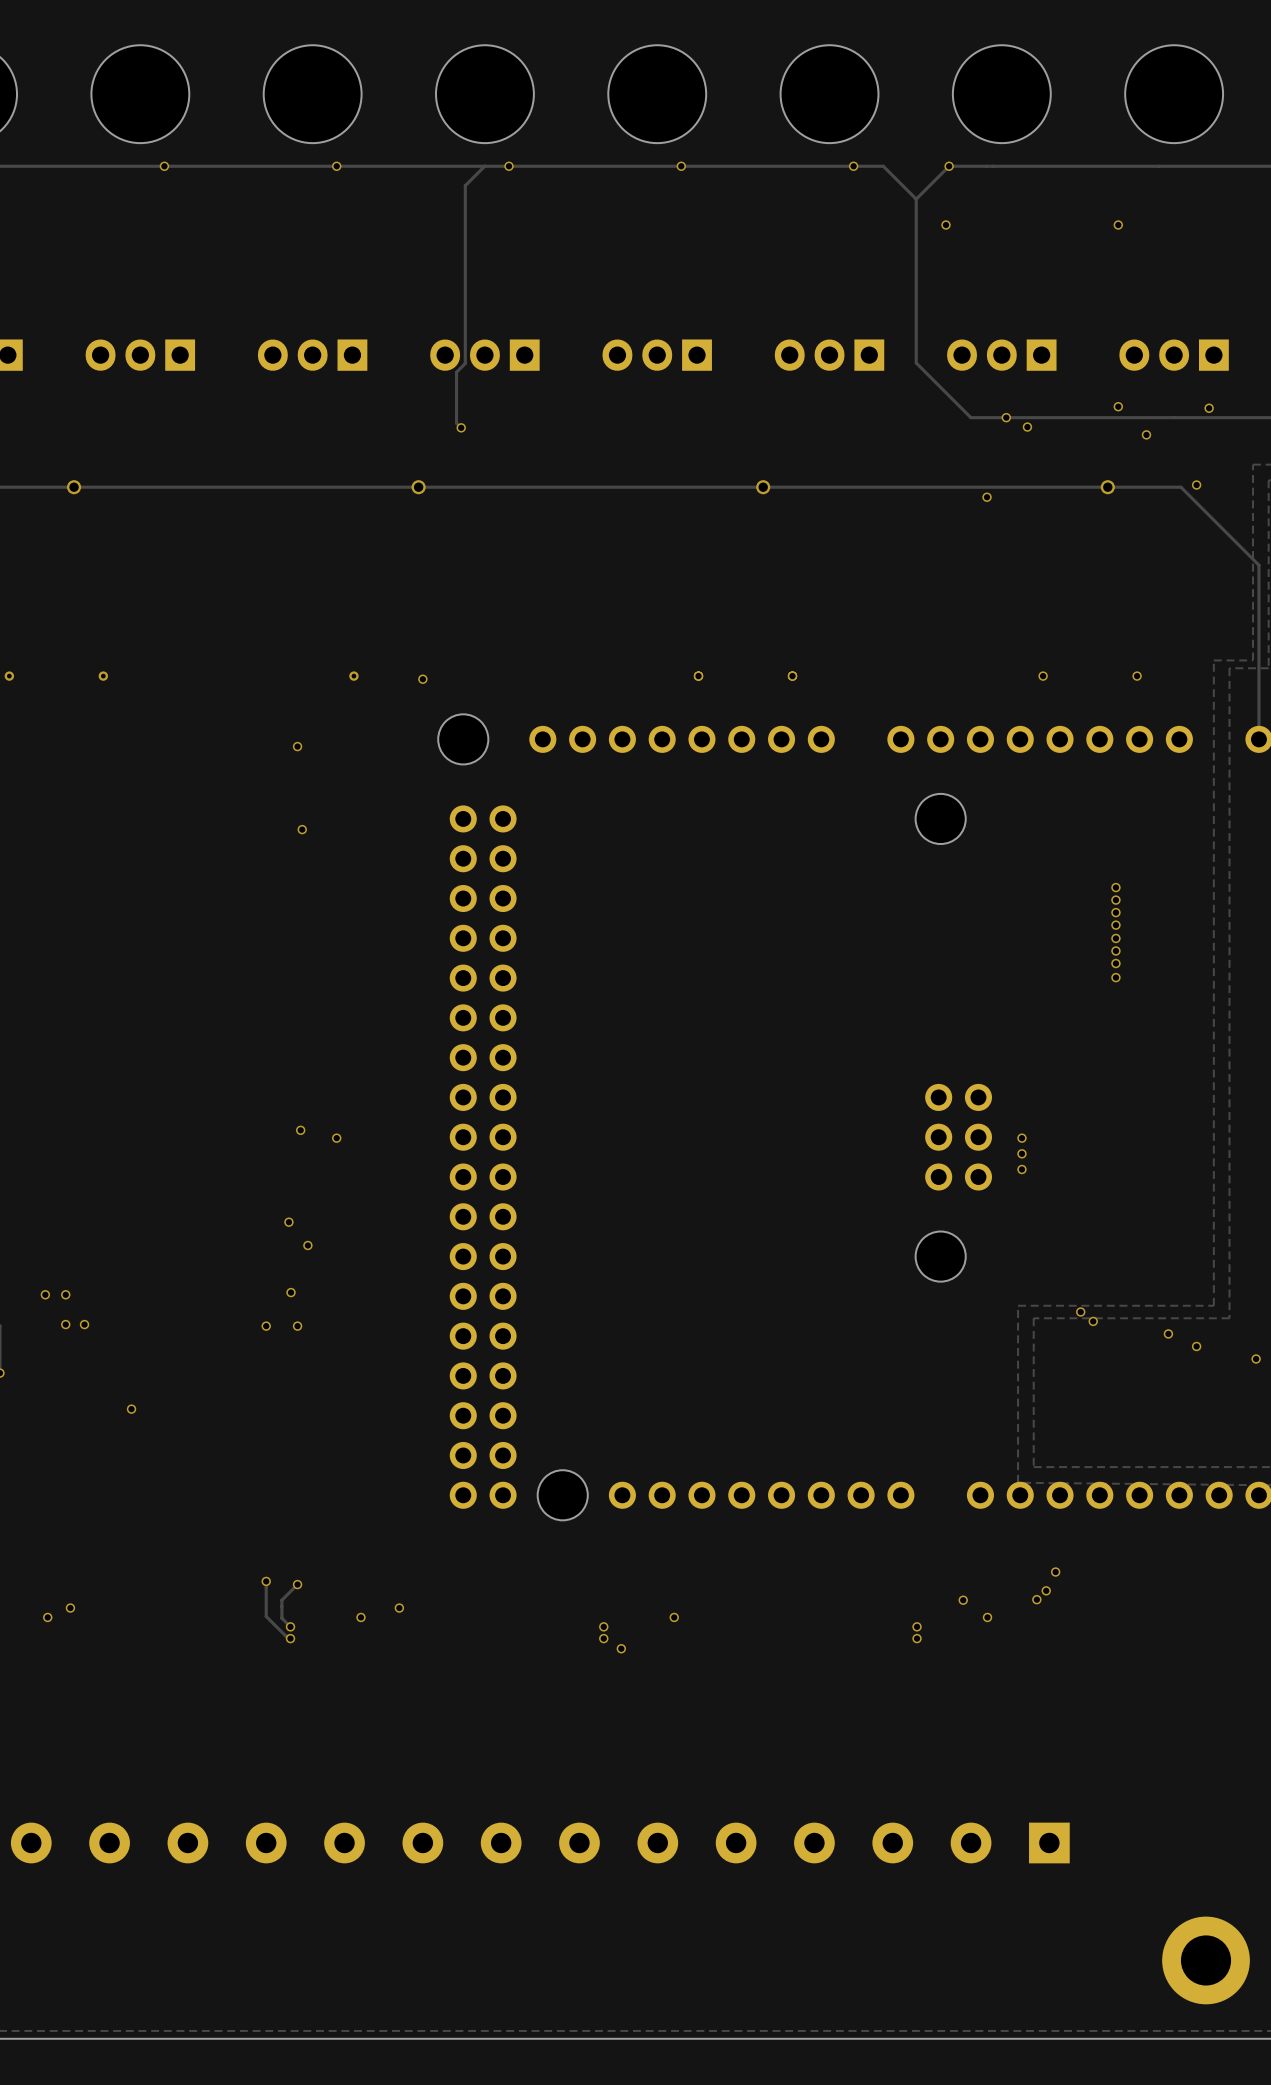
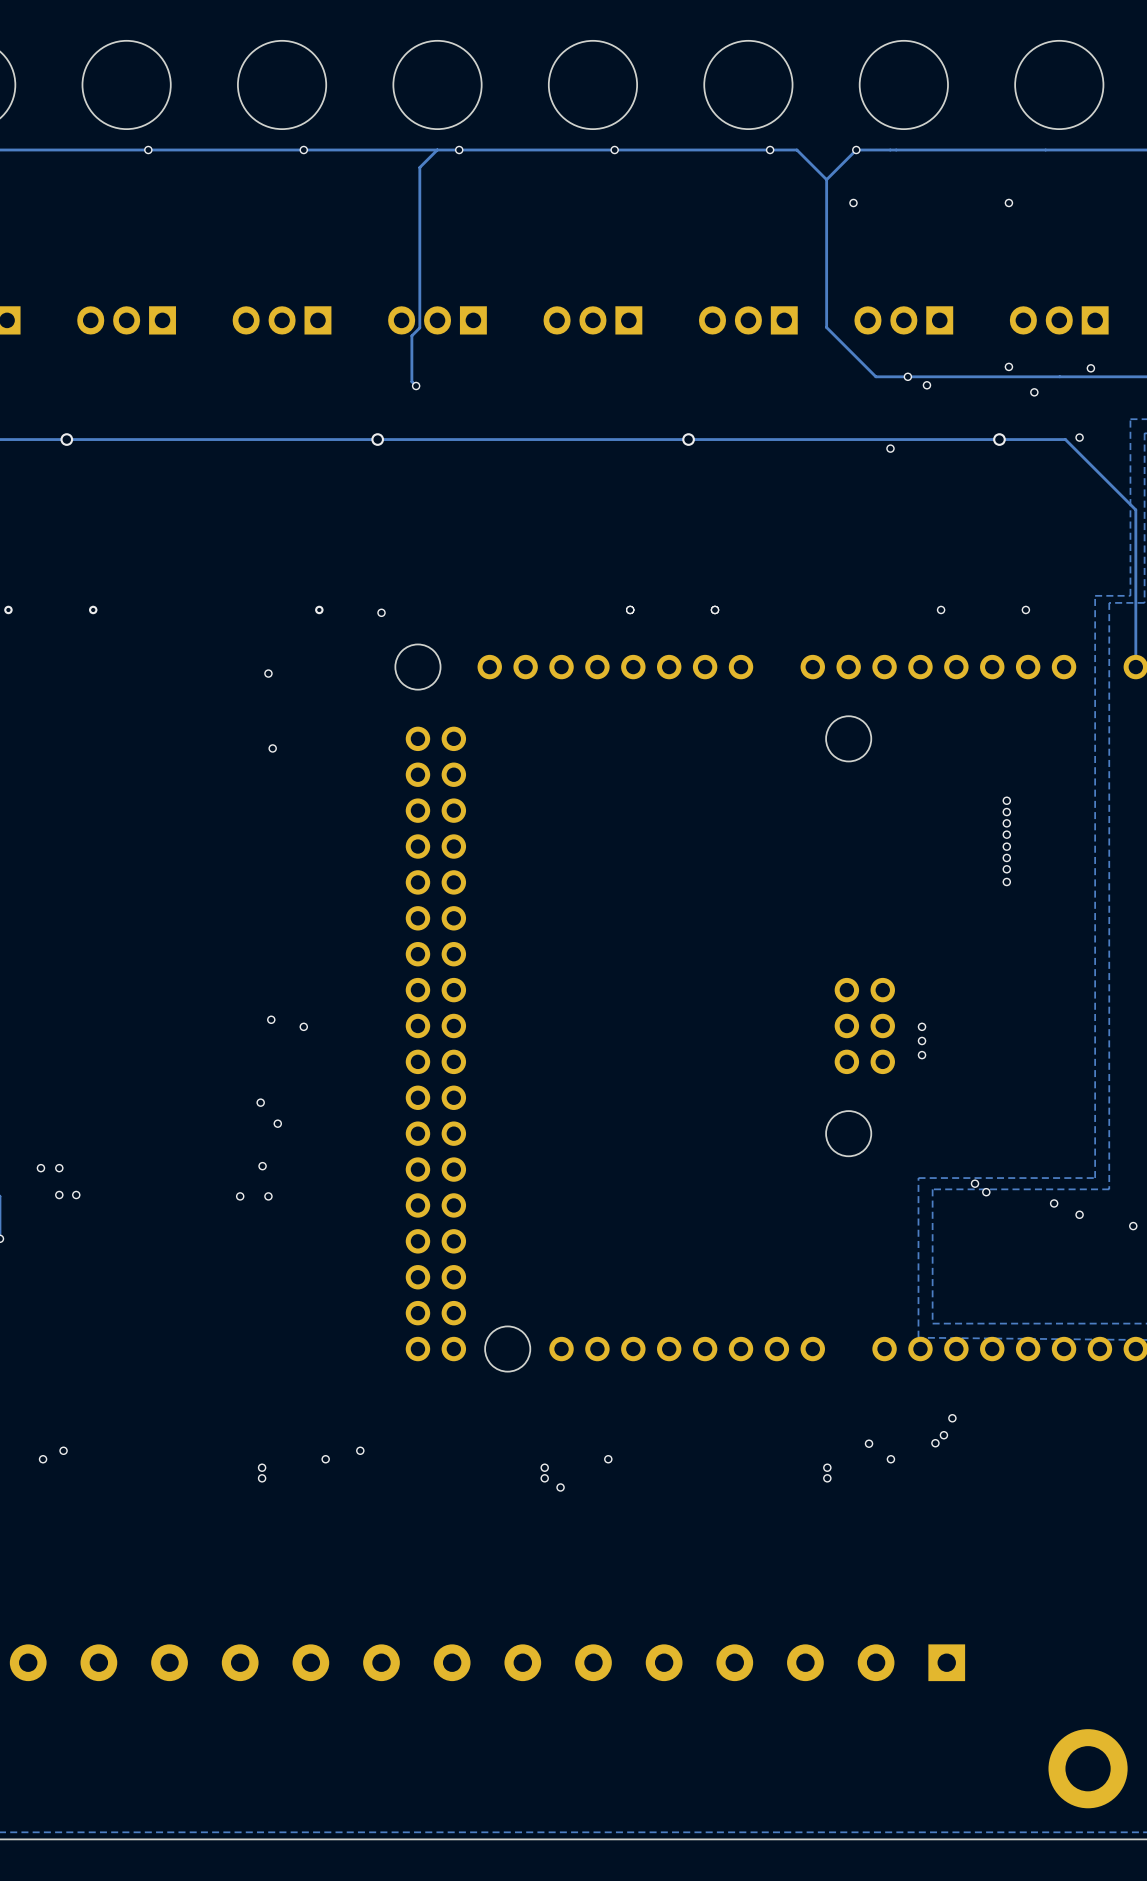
via: (131, 1409) -> none
track: (266, 1581) (266, 1616) (290, 1638) -> none
via: (266, 1581) -> none
track: (297, 1584) (281, 1600) (281, 1618) (290, 1626) -> none
via: (297, 1584) -> none

